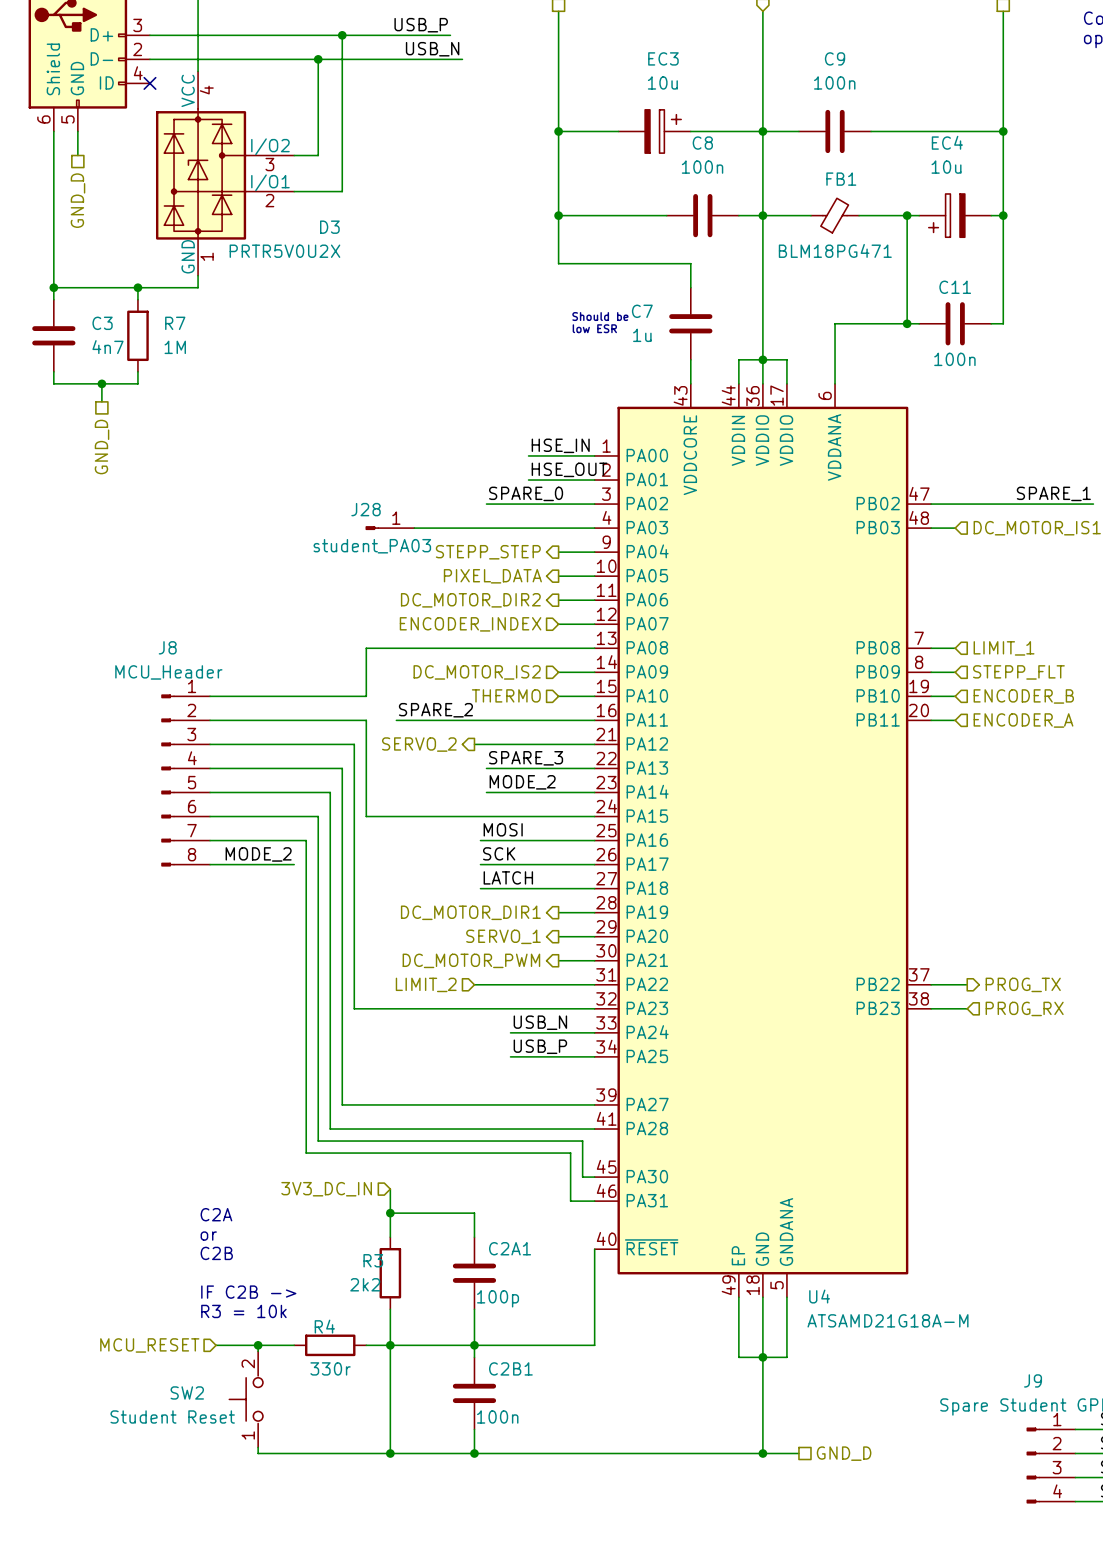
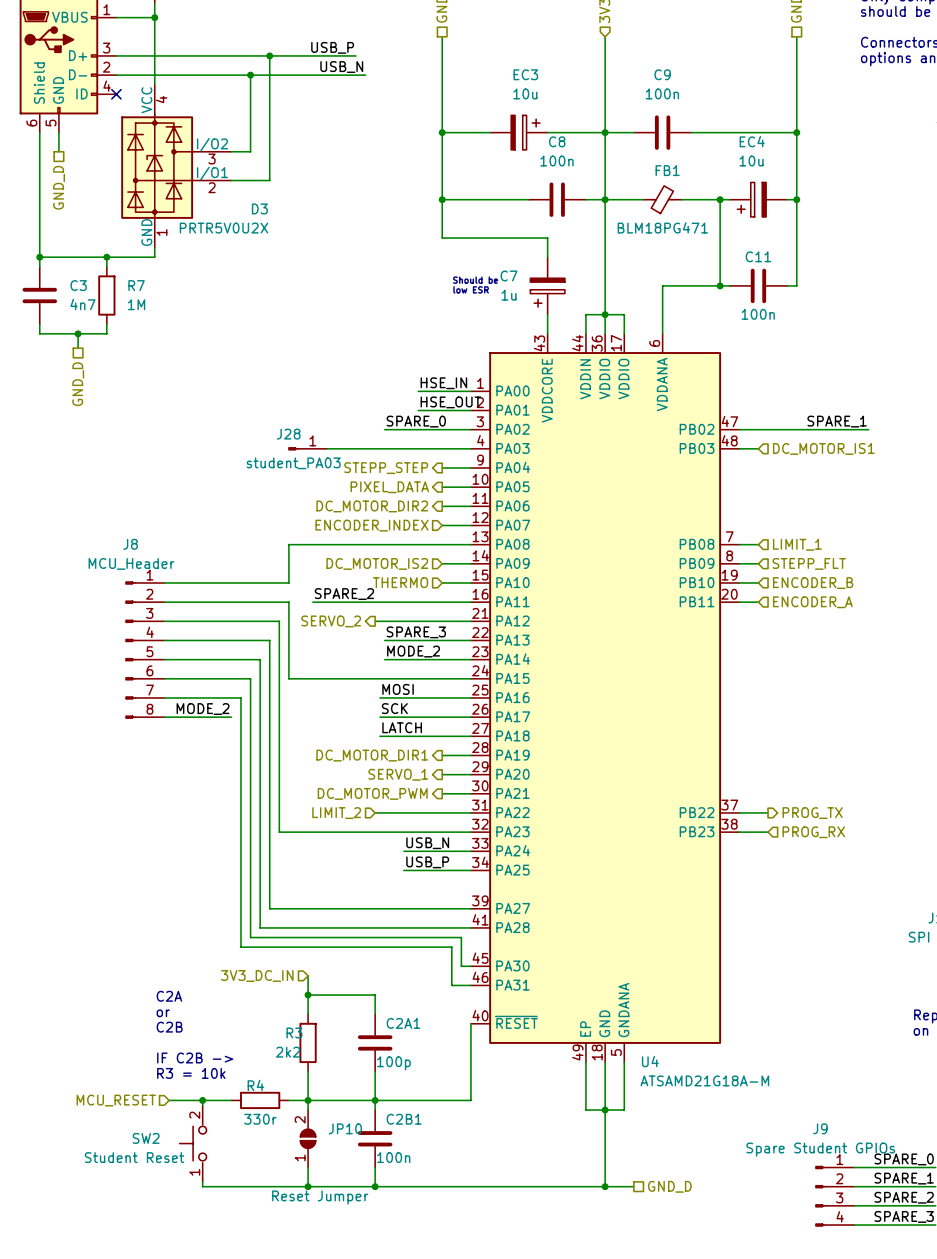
C7 symbol: [669, 287, 713, 360] -> [530, 257, 565, 315]
JP10: none -> Reset Jumper (308, 1138)

